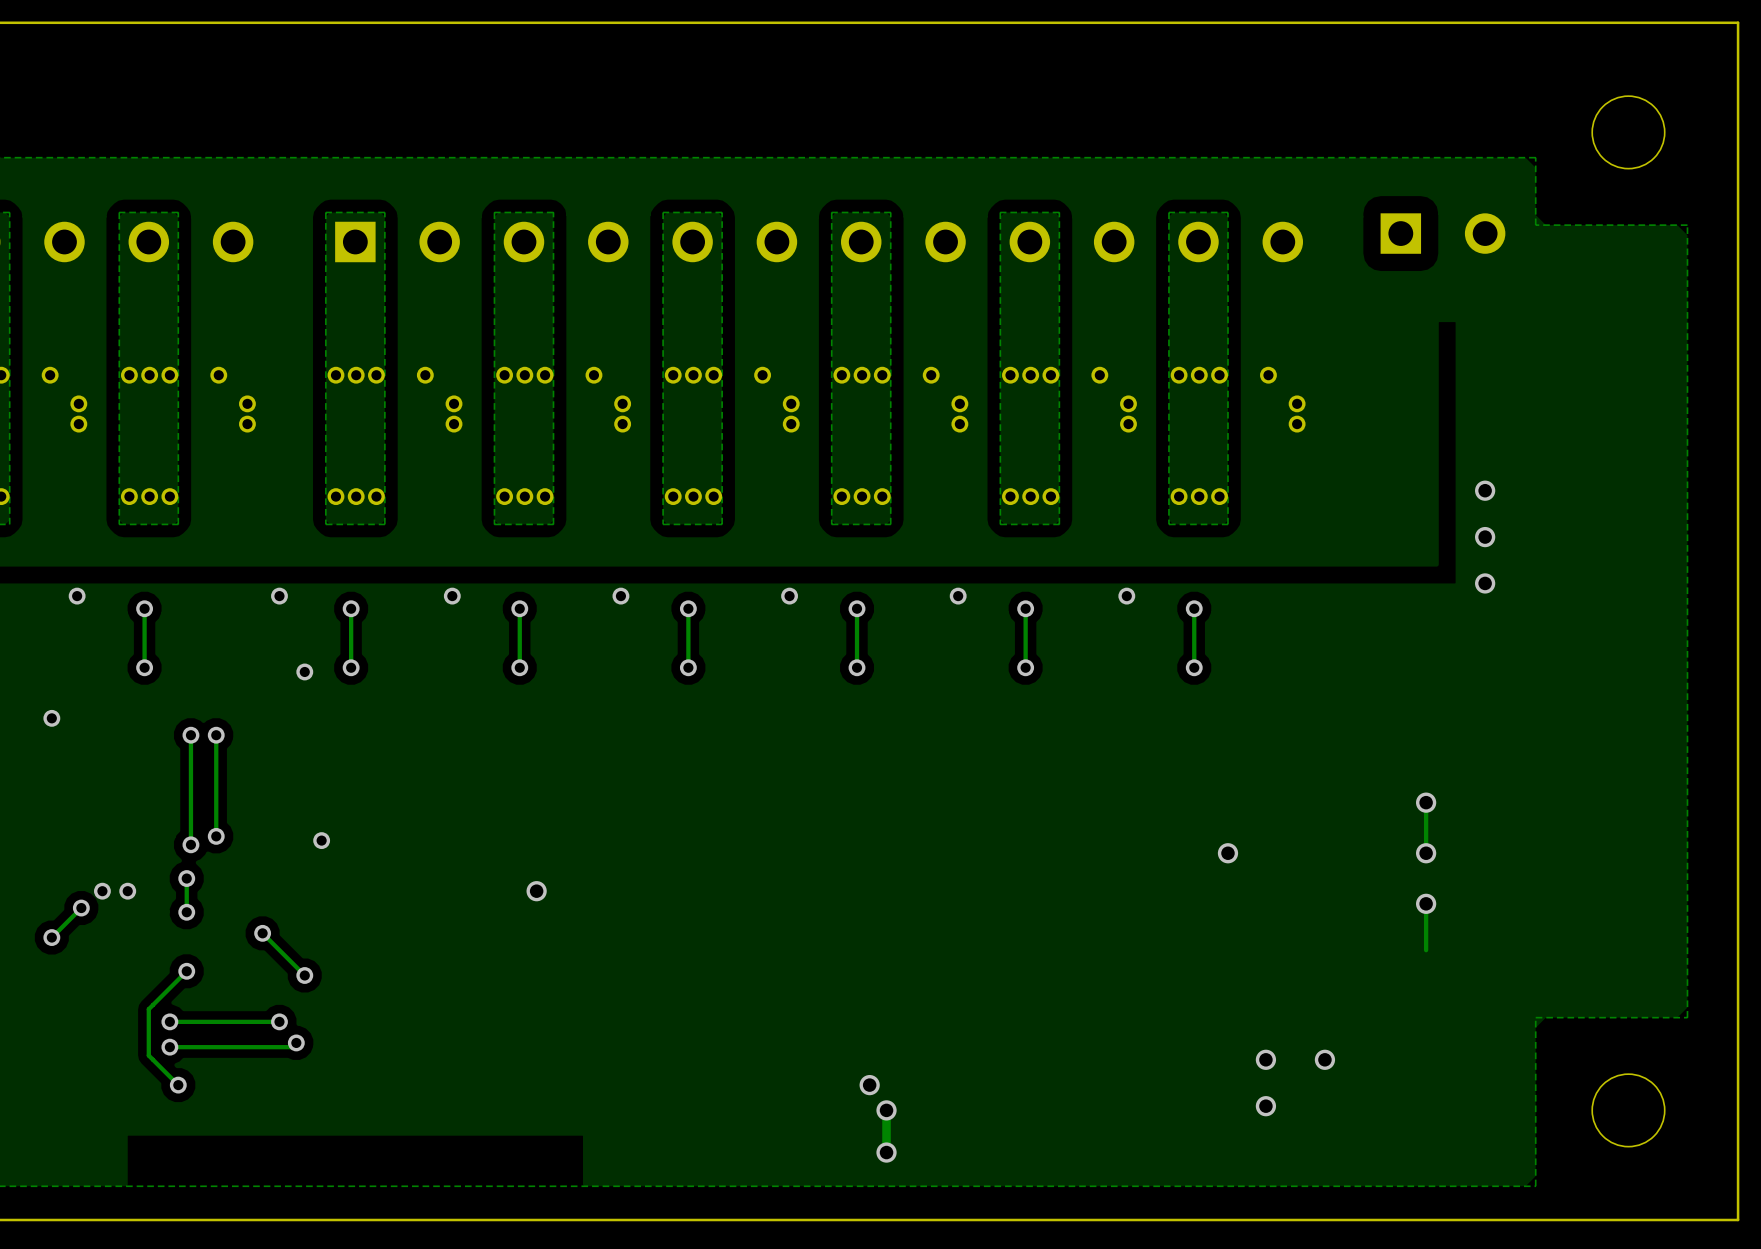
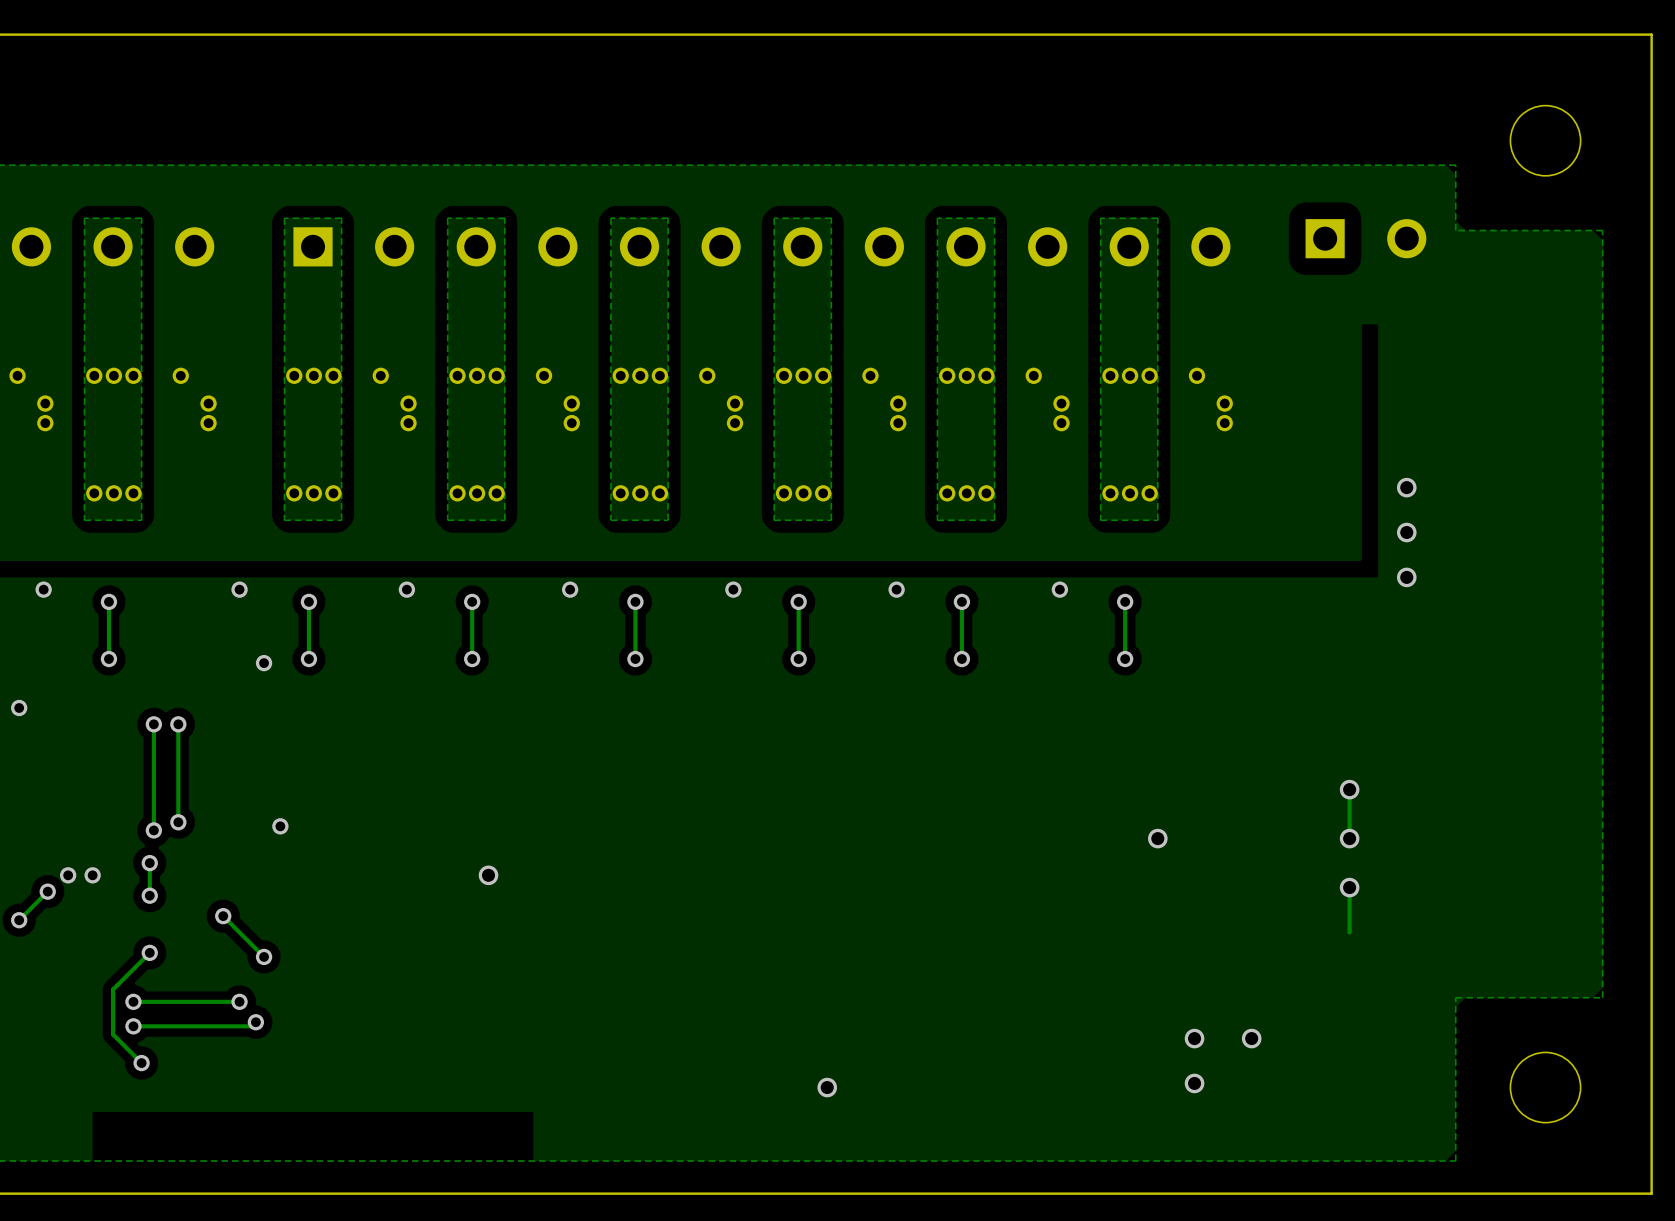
via: (869, 1085) -> none
track: (886, 1110) (886, 1152) -> none
via: (886, 1152) -> none

